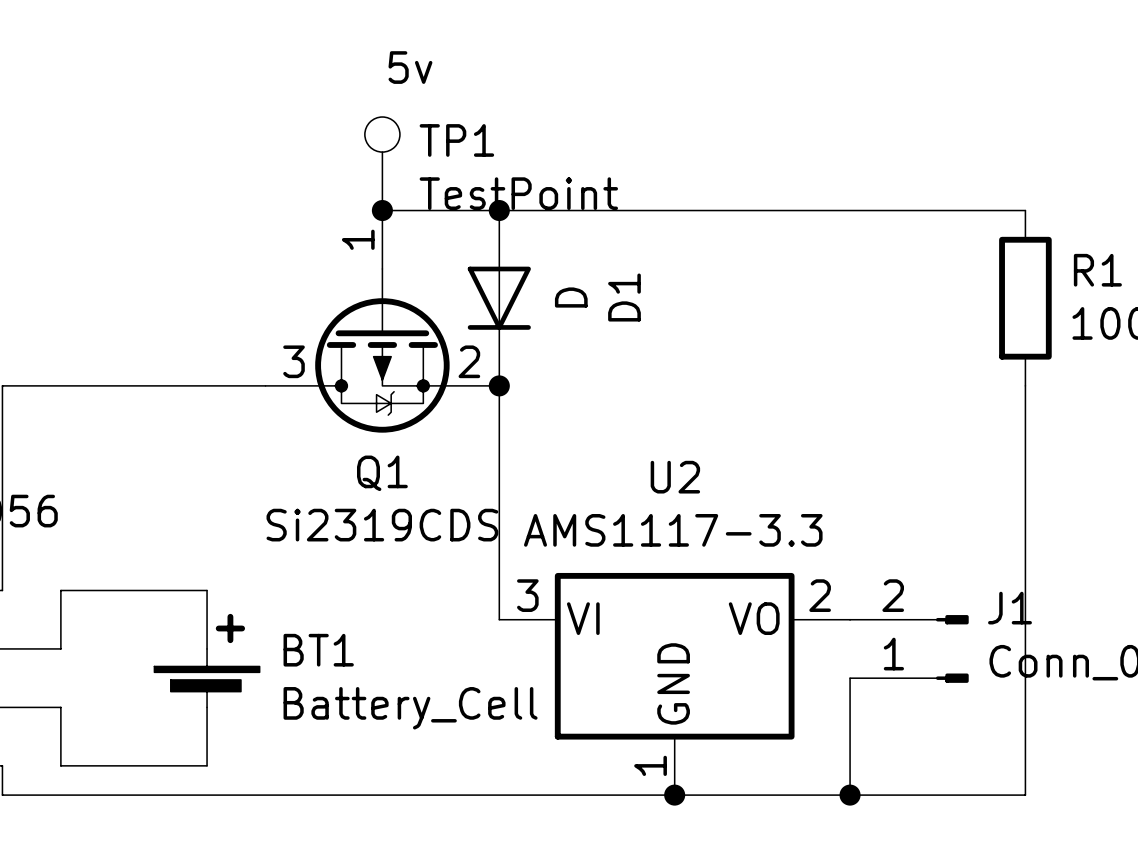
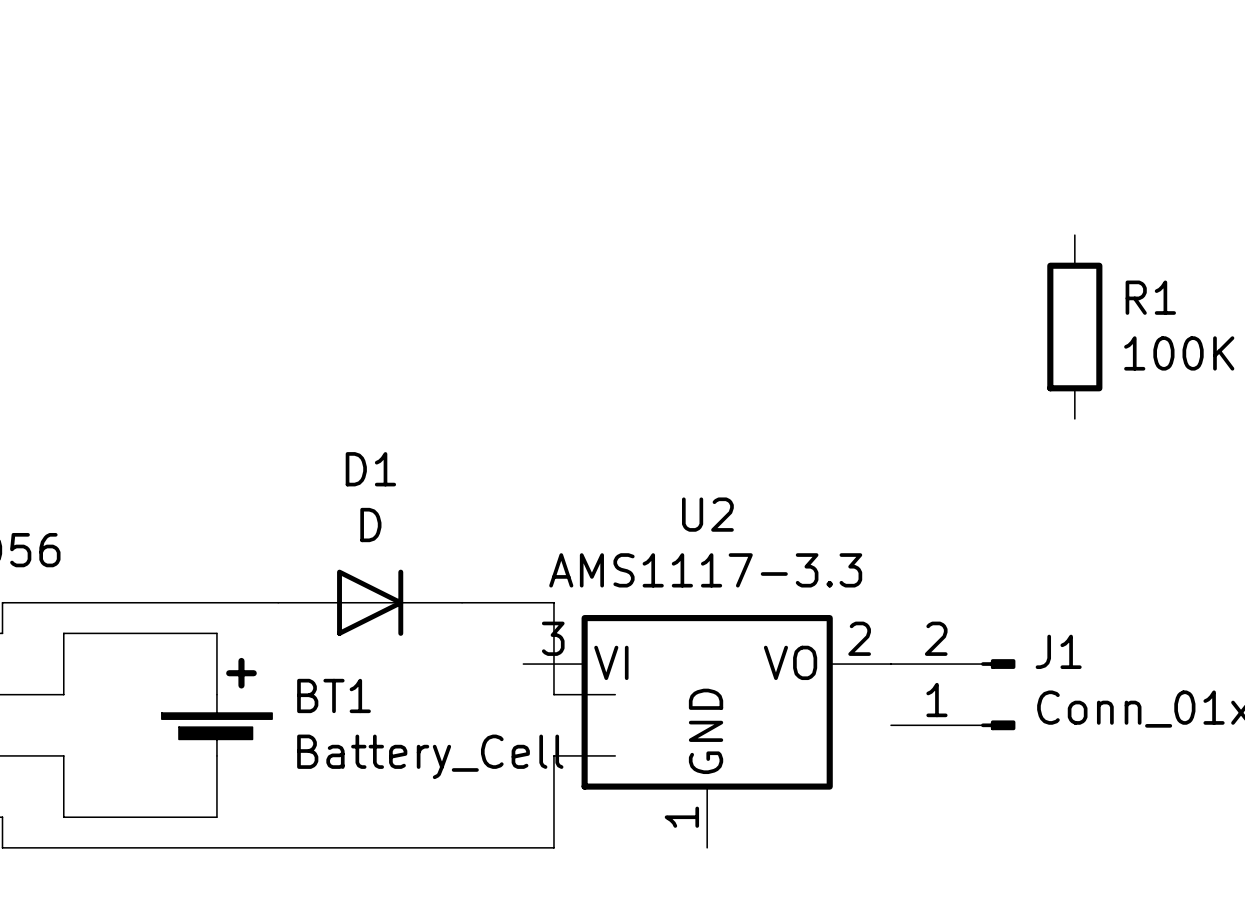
label: 5v (410, 67) -> none
TP1: TestPoint (382, 163) -> none
wire: (382, 210) (1025, 210) -> none
junction: (382, 210) -> none
junction: (499, 210) -> none
D1 rotation: 0° (499, 298) -> 90° counterclockwise (370, 602)
D1 position: (499, 298) -> (370, 602)
Q1: Si2319CDS (382, 321) -> none
wire: (265, 385) (2, 385) (2, 561) -> (278, 602) (2, 602)
wire: (499, 385) (499, 619) -> none
junction: (499, 385) -> none
wire: (1025, 385) (1025, 795) (528, 795) -> (615, 755) (553, 755) (553, 847)
wire: none -> (462, 602) (553, 602) (553, 694) (615, 694)
wire: (850, 678) (850, 795) -> none
junction: (674, 795) -> none
junction: (850, 795) -> none

